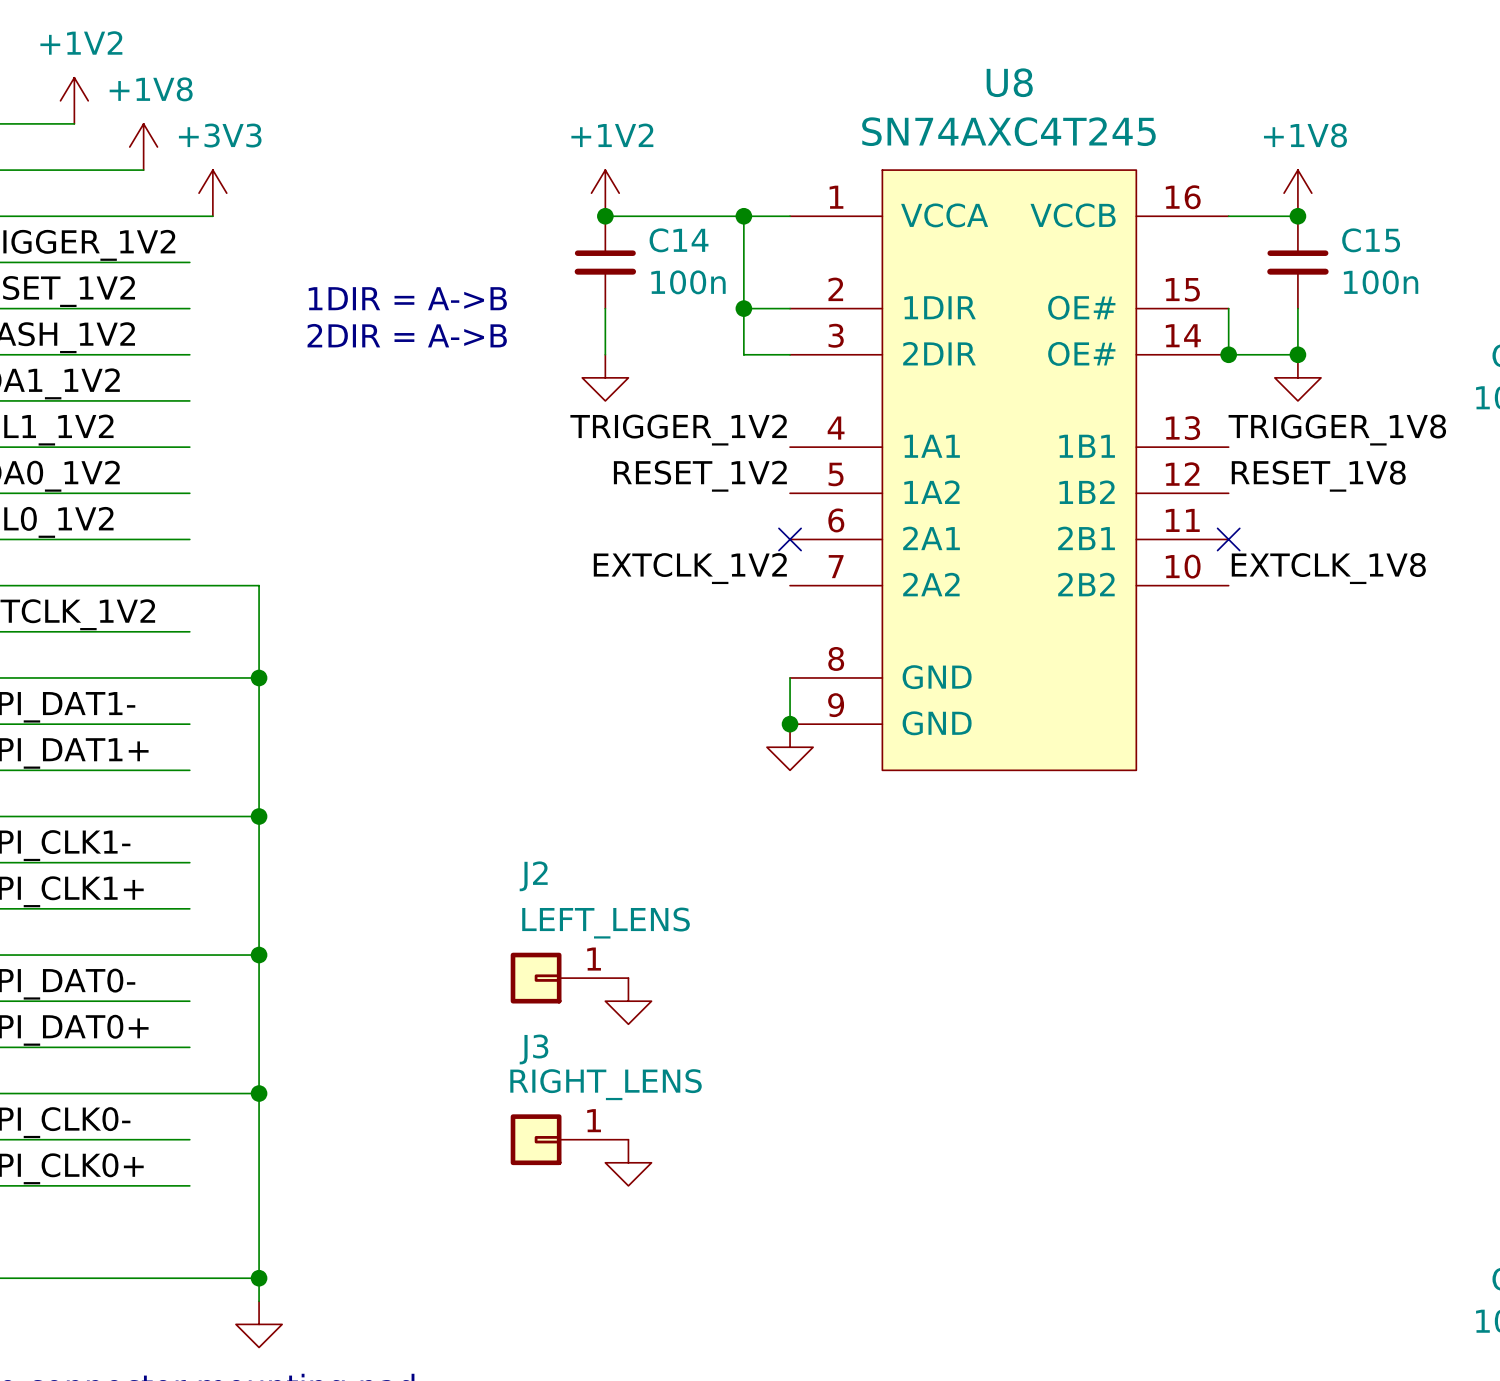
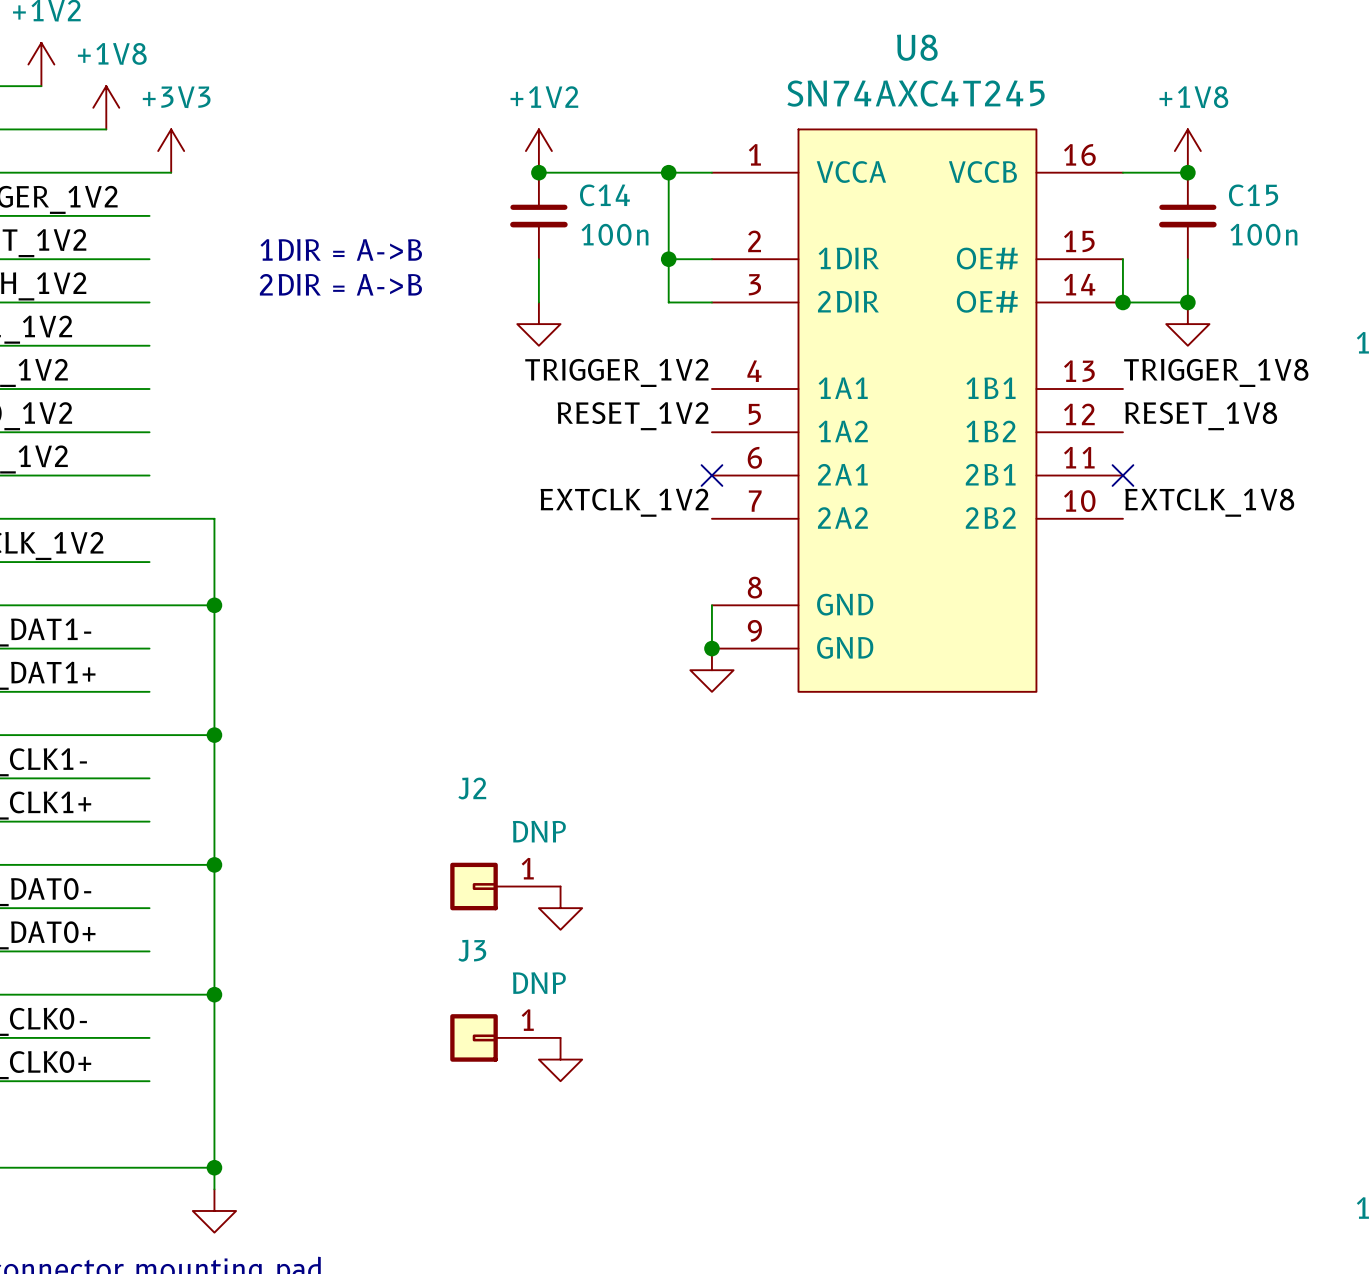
J2 value: LEFT_LENS (606, 923) -> DNP (539, 831)
J3 value: RIGHT_LENS (606, 1084) -> DNP (539, 983)

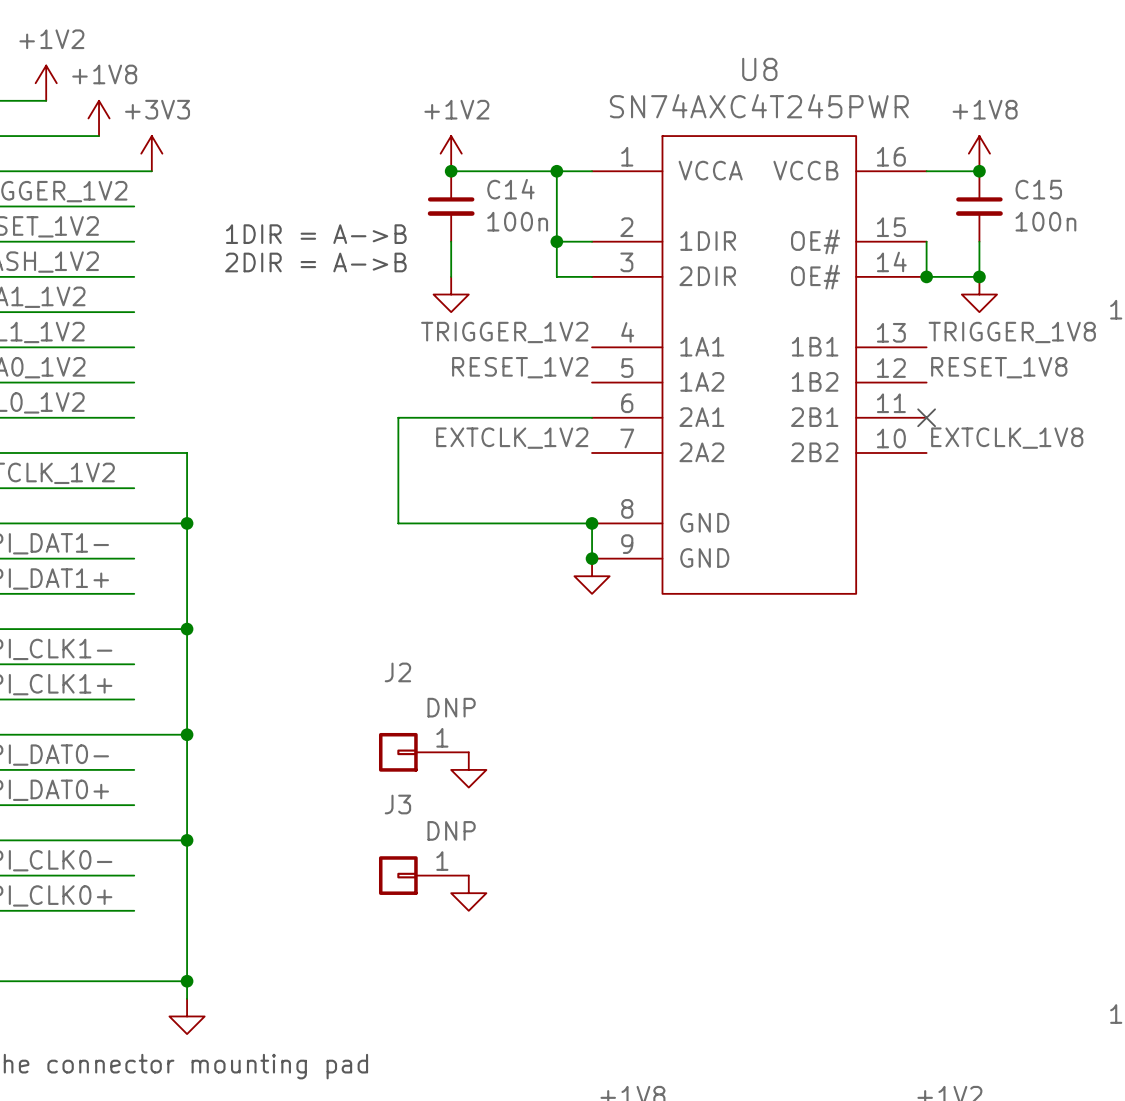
U8 value: SN74AXC4T245 (916, 93) -> SN74AXC4T245PWR (759, 106)
wire: none -> (592, 417) (398, 417) (398, 523) (592, 523)
no-connect mark: (711, 475) -> none
junction: none -> (592, 523)

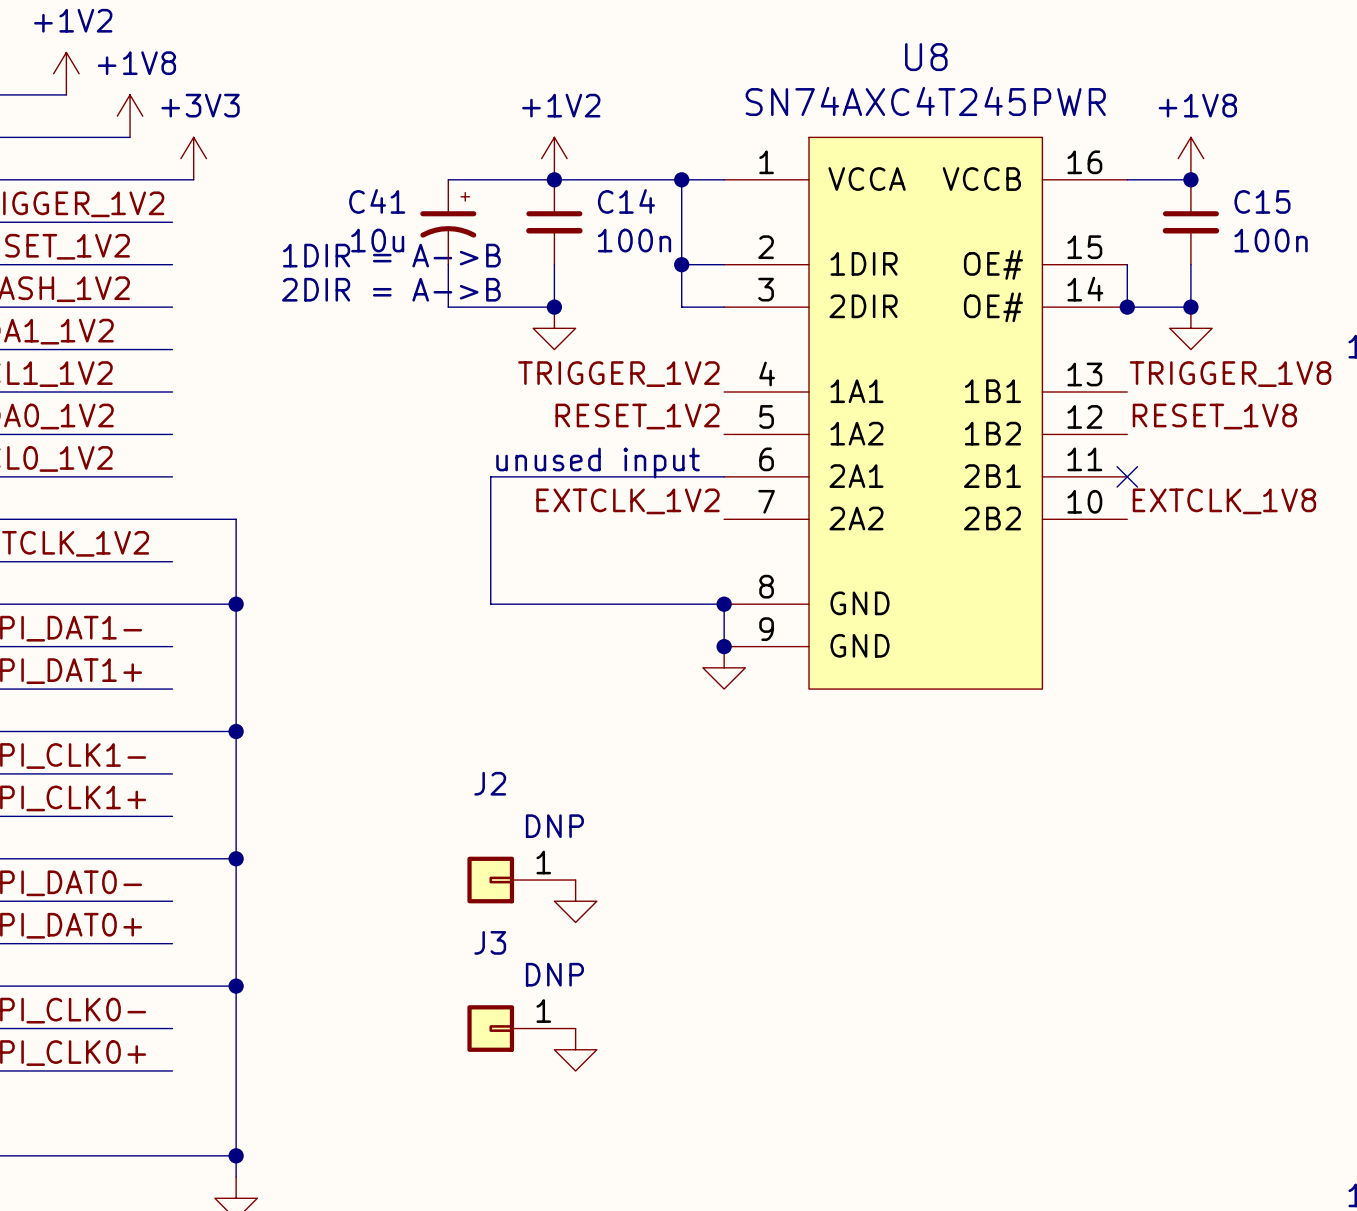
wire: none -> (448, 179) (554, 179)
C41: none -> 10u (448, 222)
wire: none -> (448, 264) (448, 307) (554, 307)
junction: none -> (554, 307)
text: none -> unused input (598, 463)

